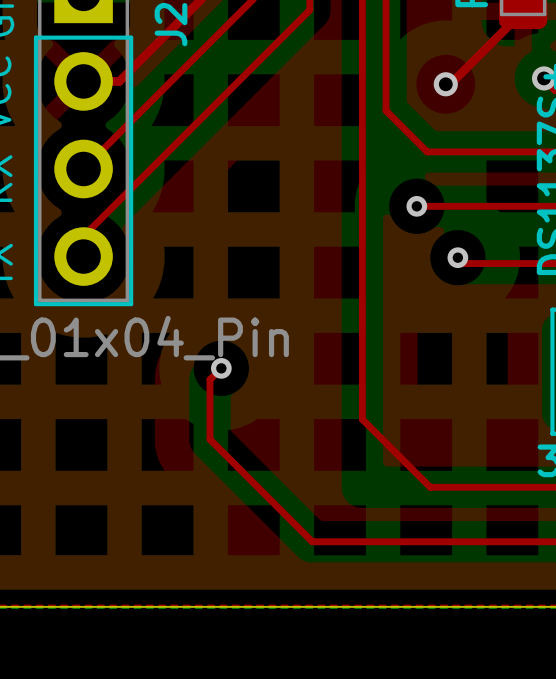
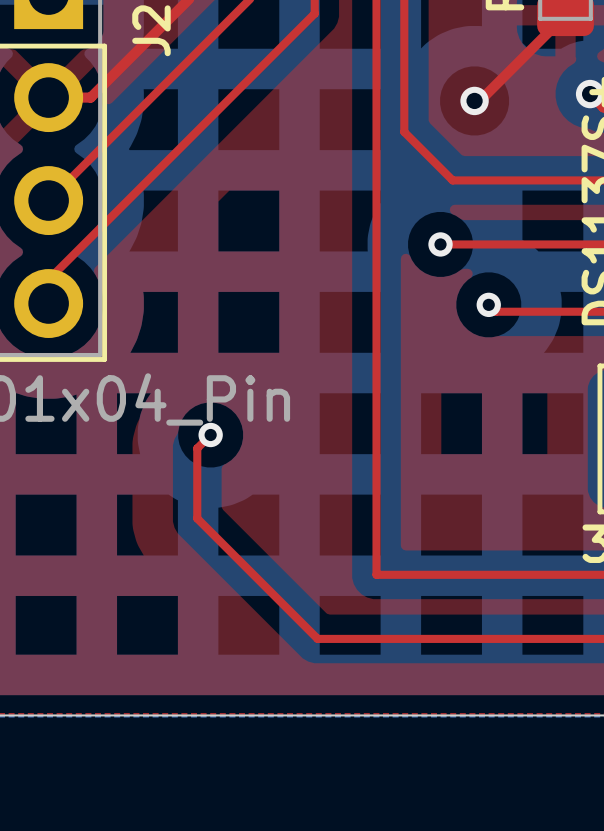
top track: (362, 419) (430, 487) -> (376, 495) (376, 574) (456, 574)

